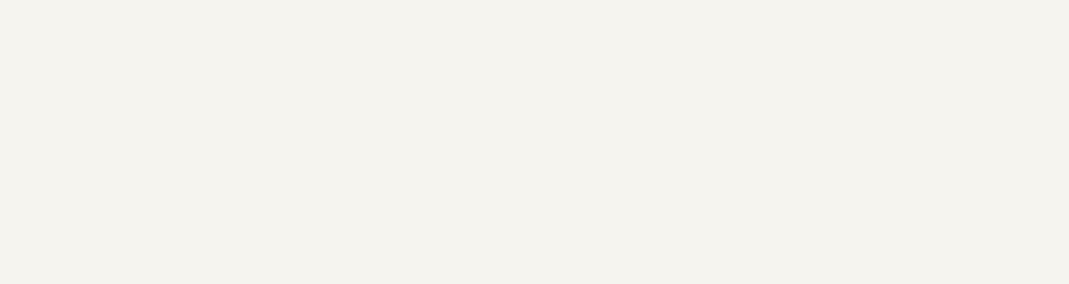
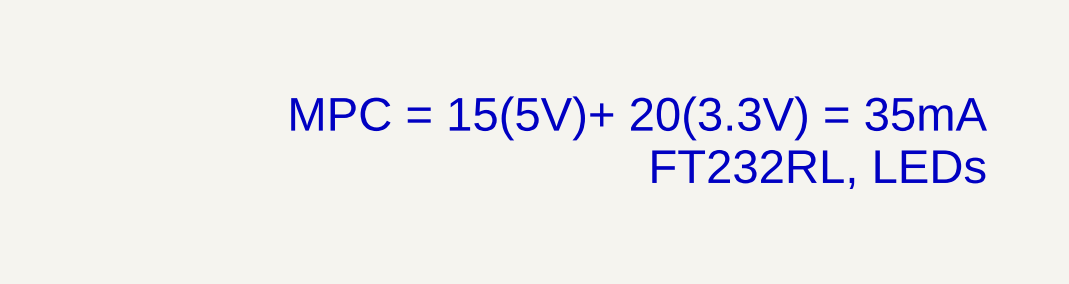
text: none -> MPC = 15(5V)+ 20(3.3V) = 35mA (639, 118)
text: none -> FT232RL, LEDs (818, 169)

